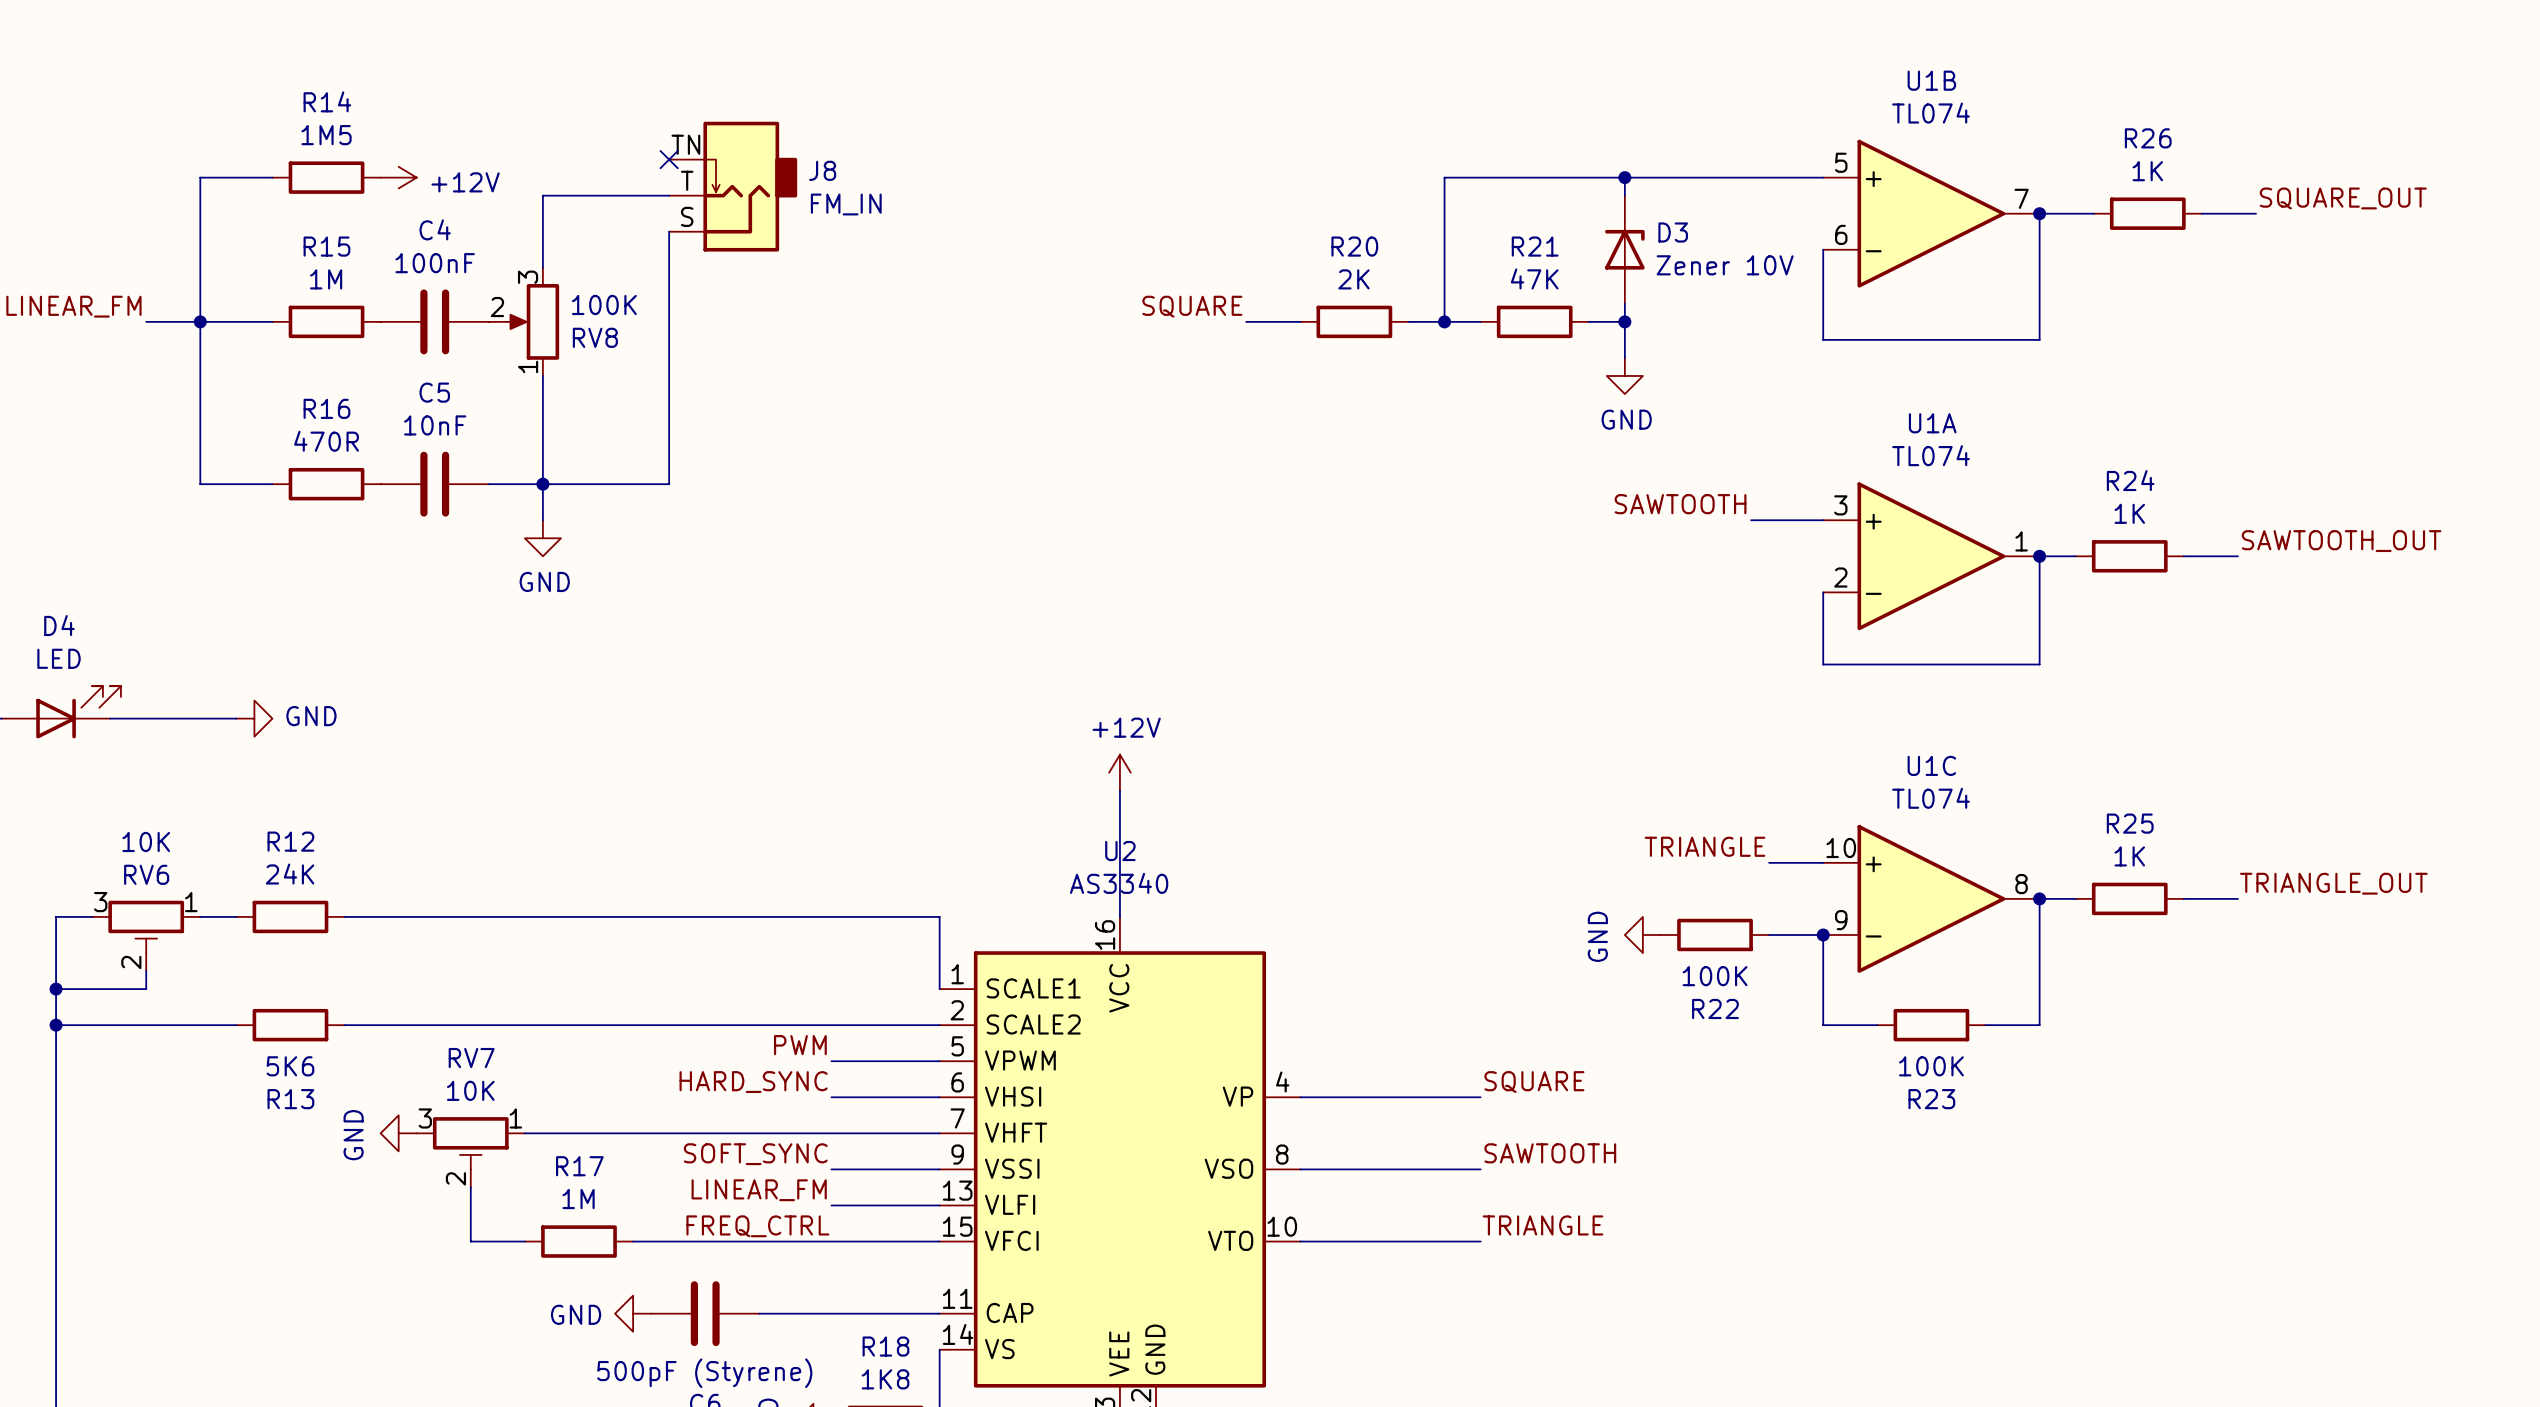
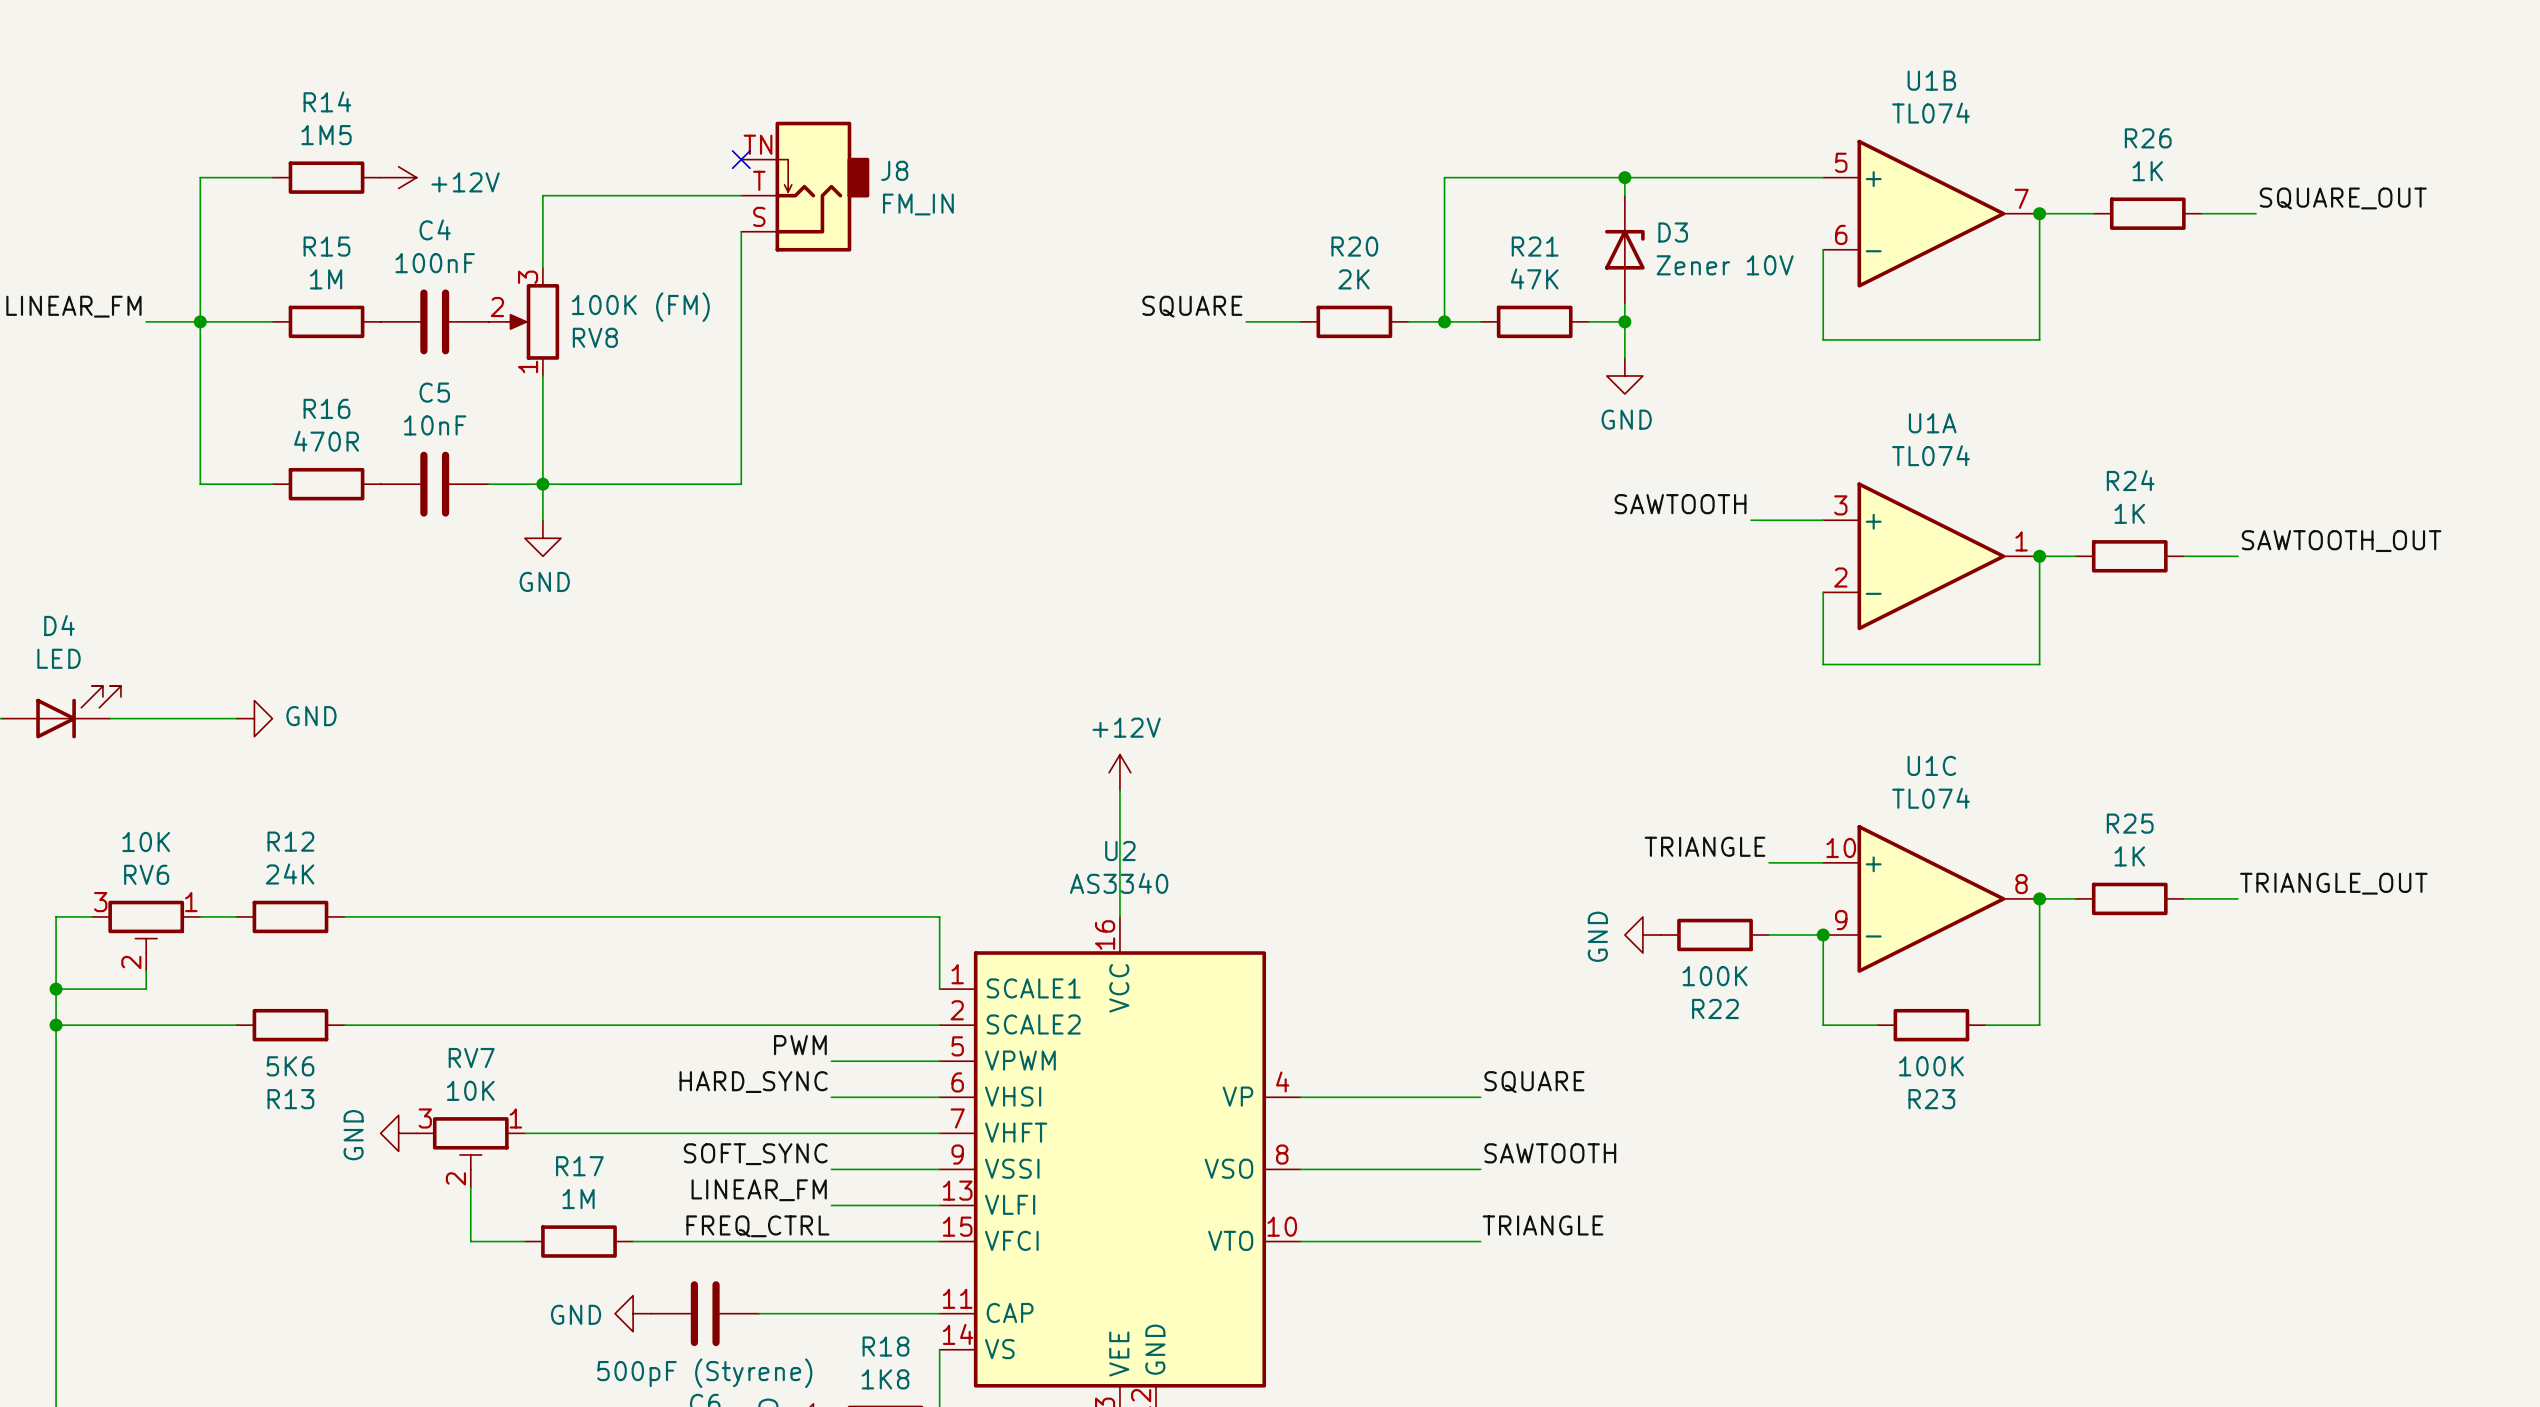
no-connect mark position: (669, 159) -> (741, 159)
J8 position: (733, 186) -> (805, 186)
wire: (669, 231) (669, 484) -> (741, 231) (741, 484) (669, 484)
RV8 value: 100K (604, 304) -> 100K (FM) (640, 307)

